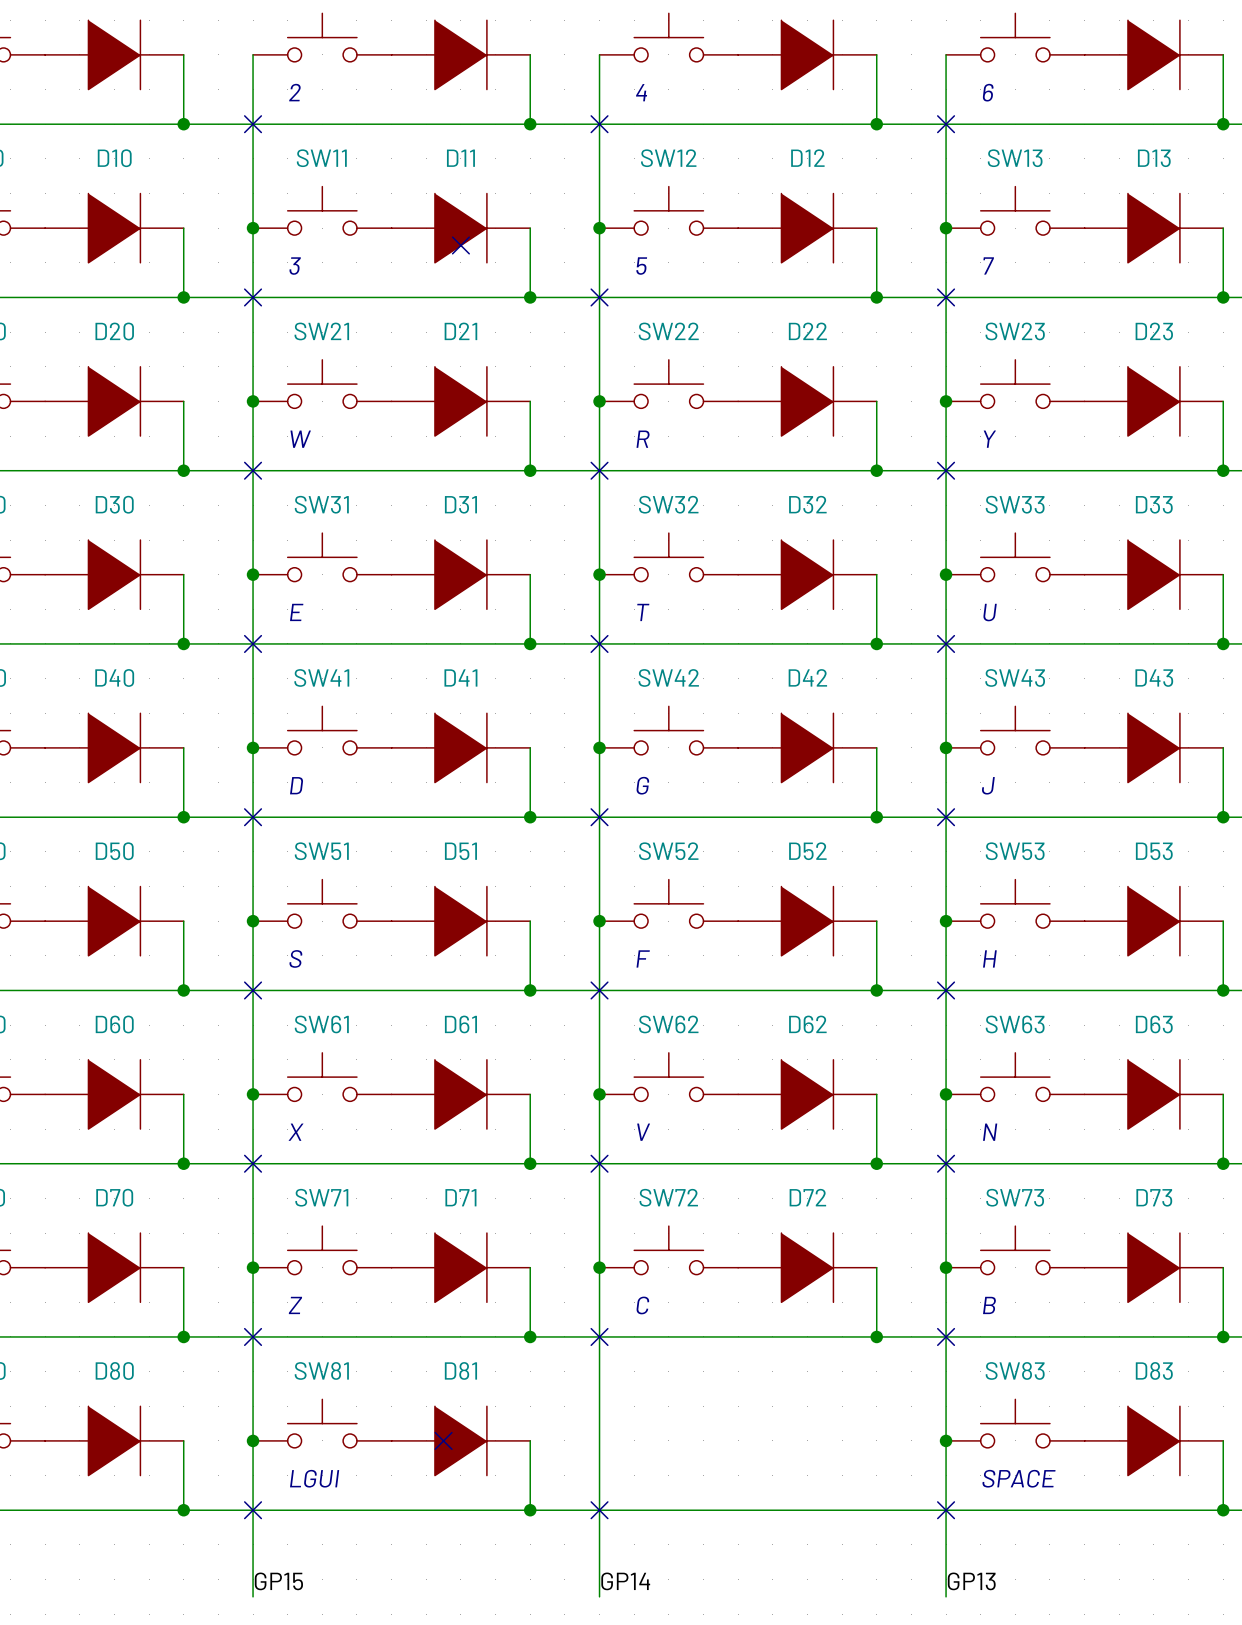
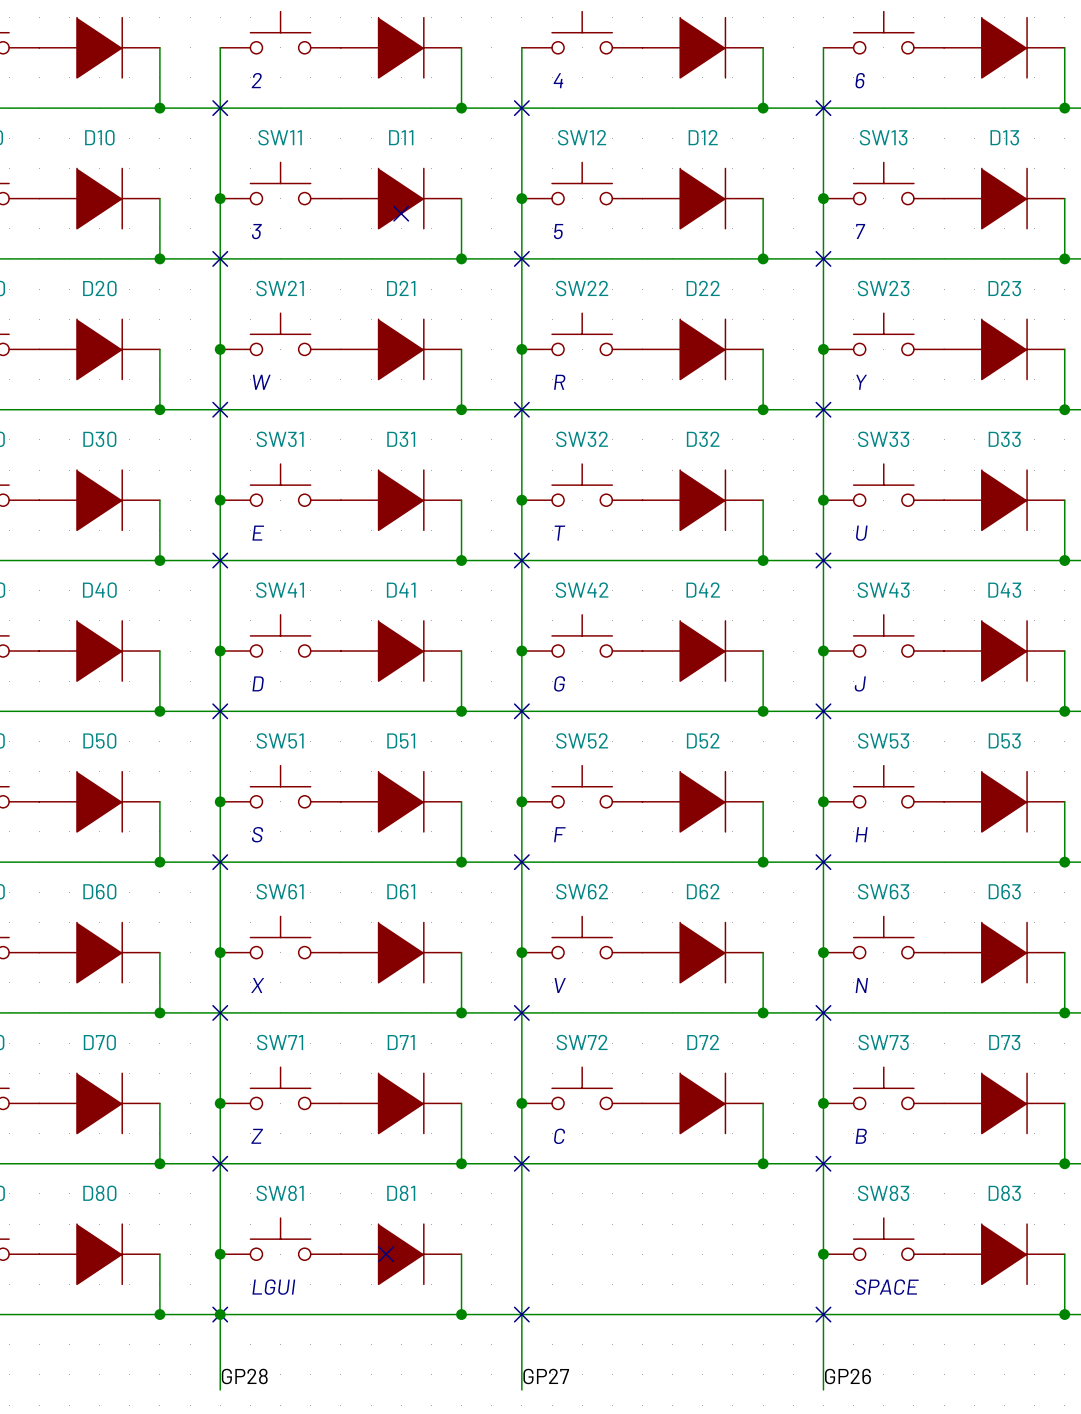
junction: none -> (220, 1314)
label: GP15 (278, 1581) -> GP28 (244, 1376)
label: GP14 (625, 1581) -> GP27 (546, 1376)
label: GP13 (971, 1581) -> GP26 (847, 1376)

